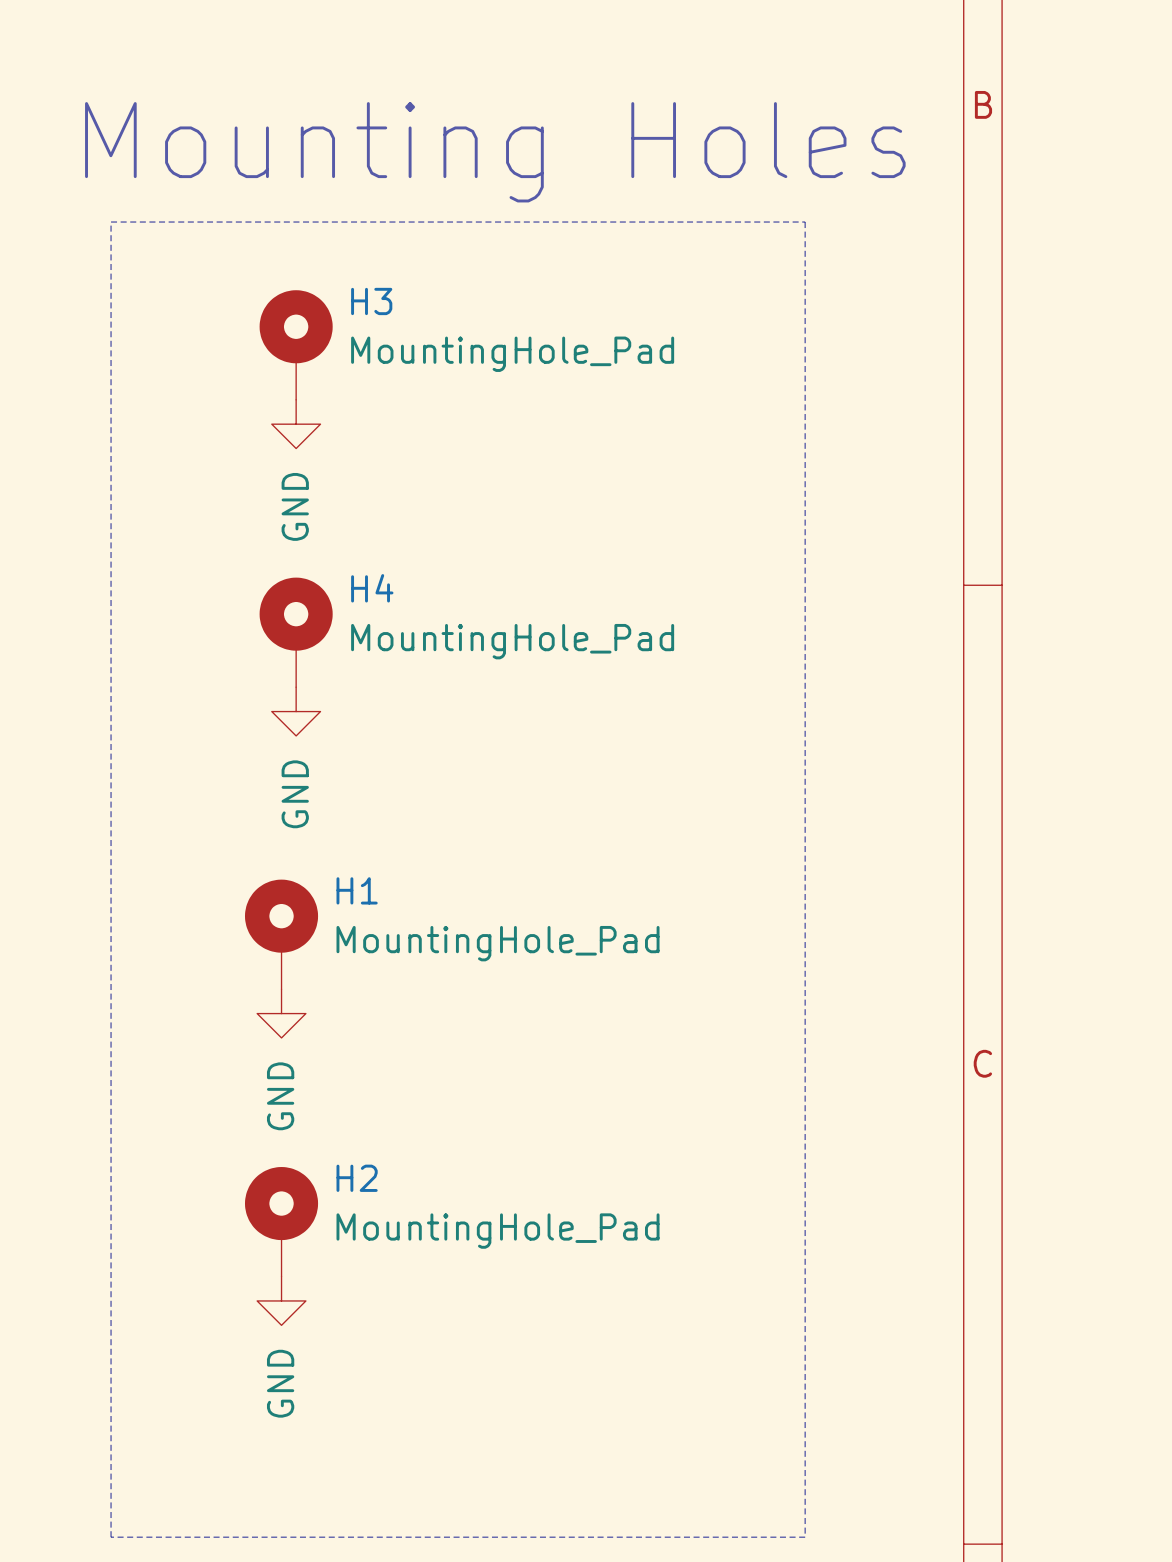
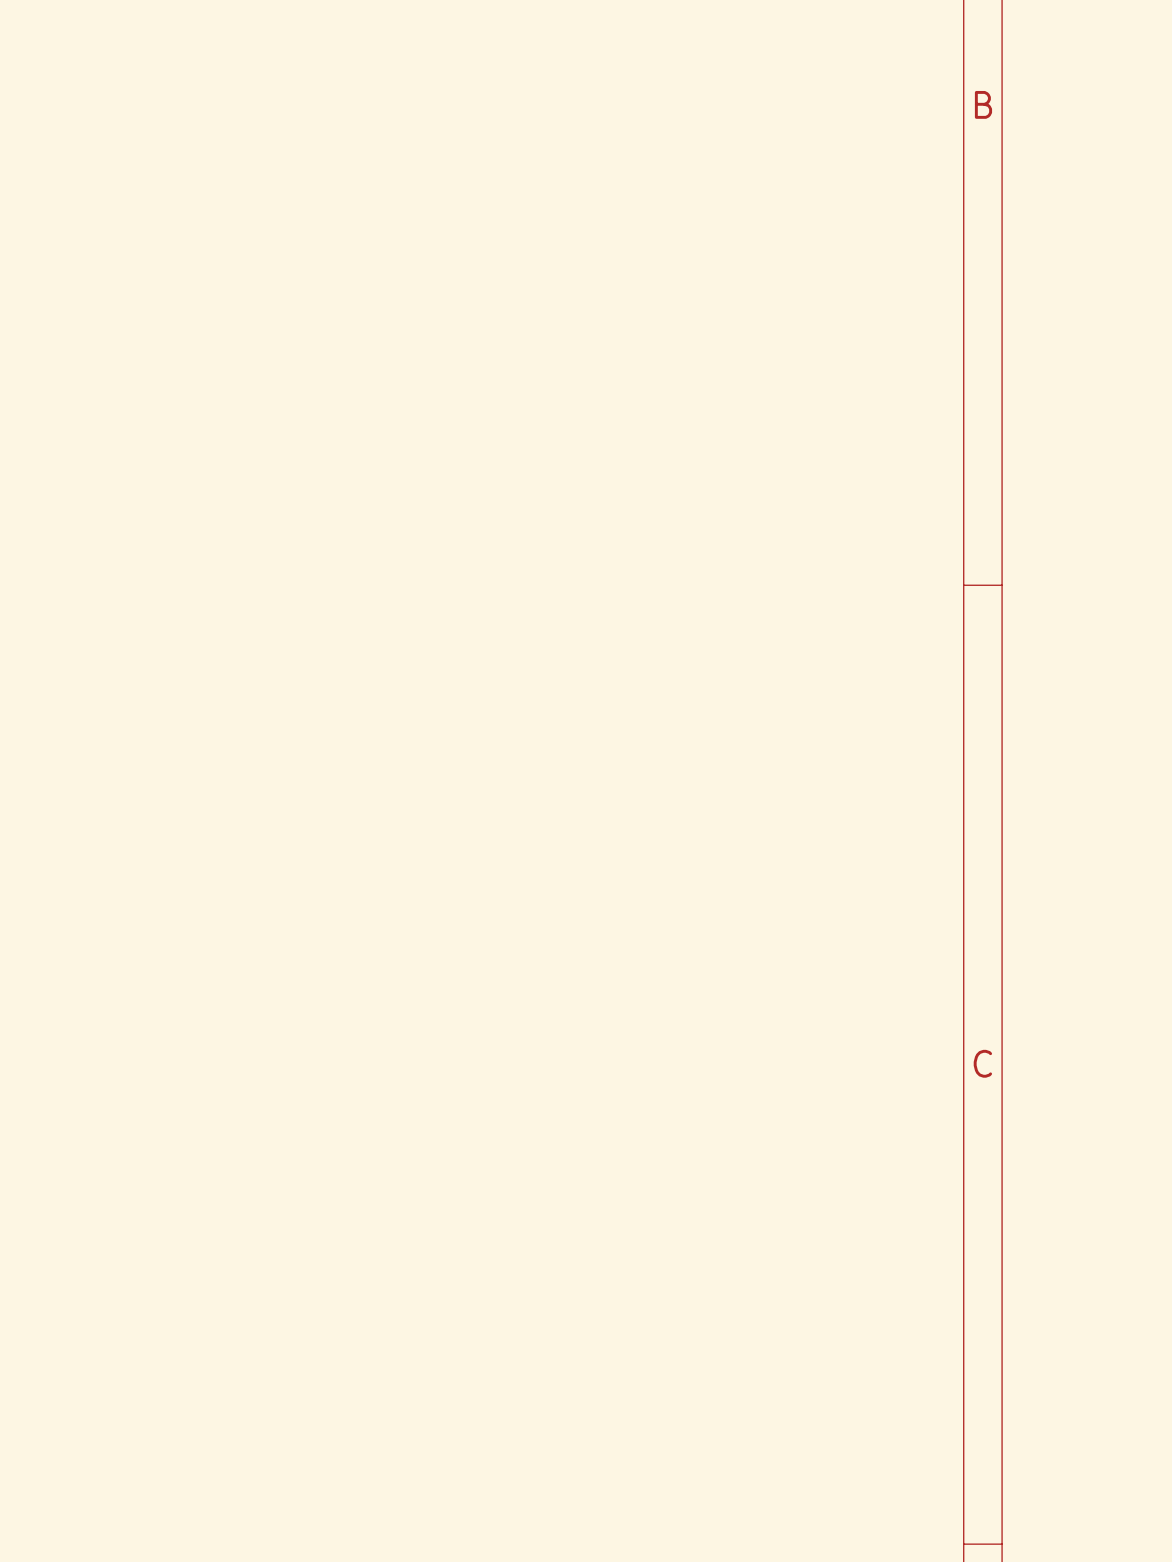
text: Mounting Holes (495, 152) -> none
line: (111, 222) (805, 222) (805, 1537) (111, 1537) (111, 222) -> none
H3: MountingHole_Pad (296, 345) -> none
power symbol: GND (296, 424) -> none
H4: MountingHole_Pad (296, 632) -> none
power symbol: GND (296, 711) -> none
H1: MountingHole_Pad (281, 934) -> none
power symbol: GND (281, 1013) -> none
H2: MountingHole_Pad (281, 1221) -> none
power symbol: GND (281, 1300) -> none

